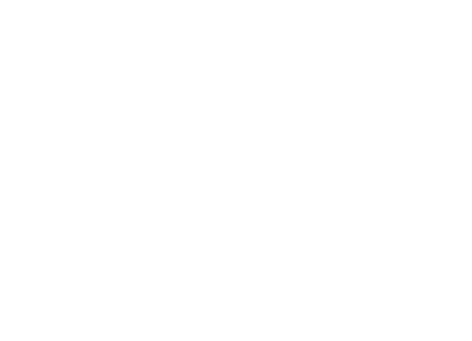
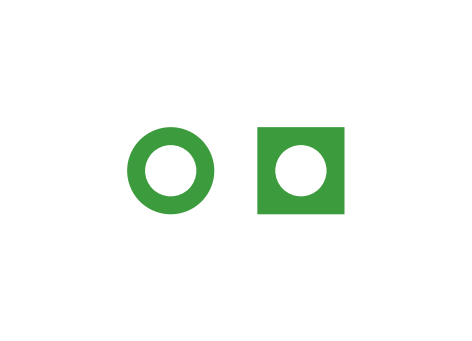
part: none -> (235, 170)

